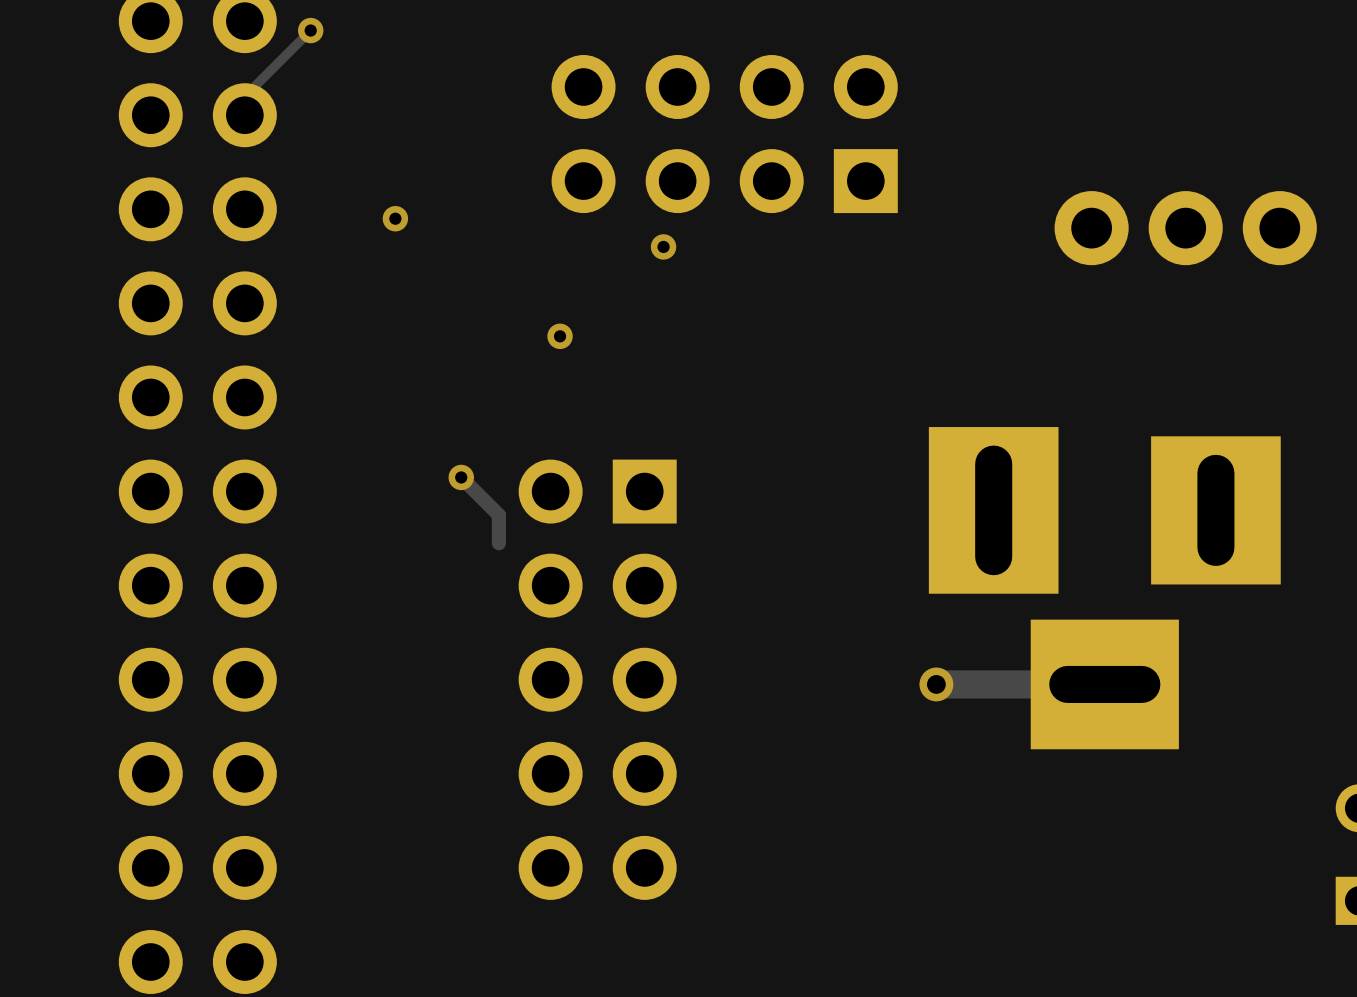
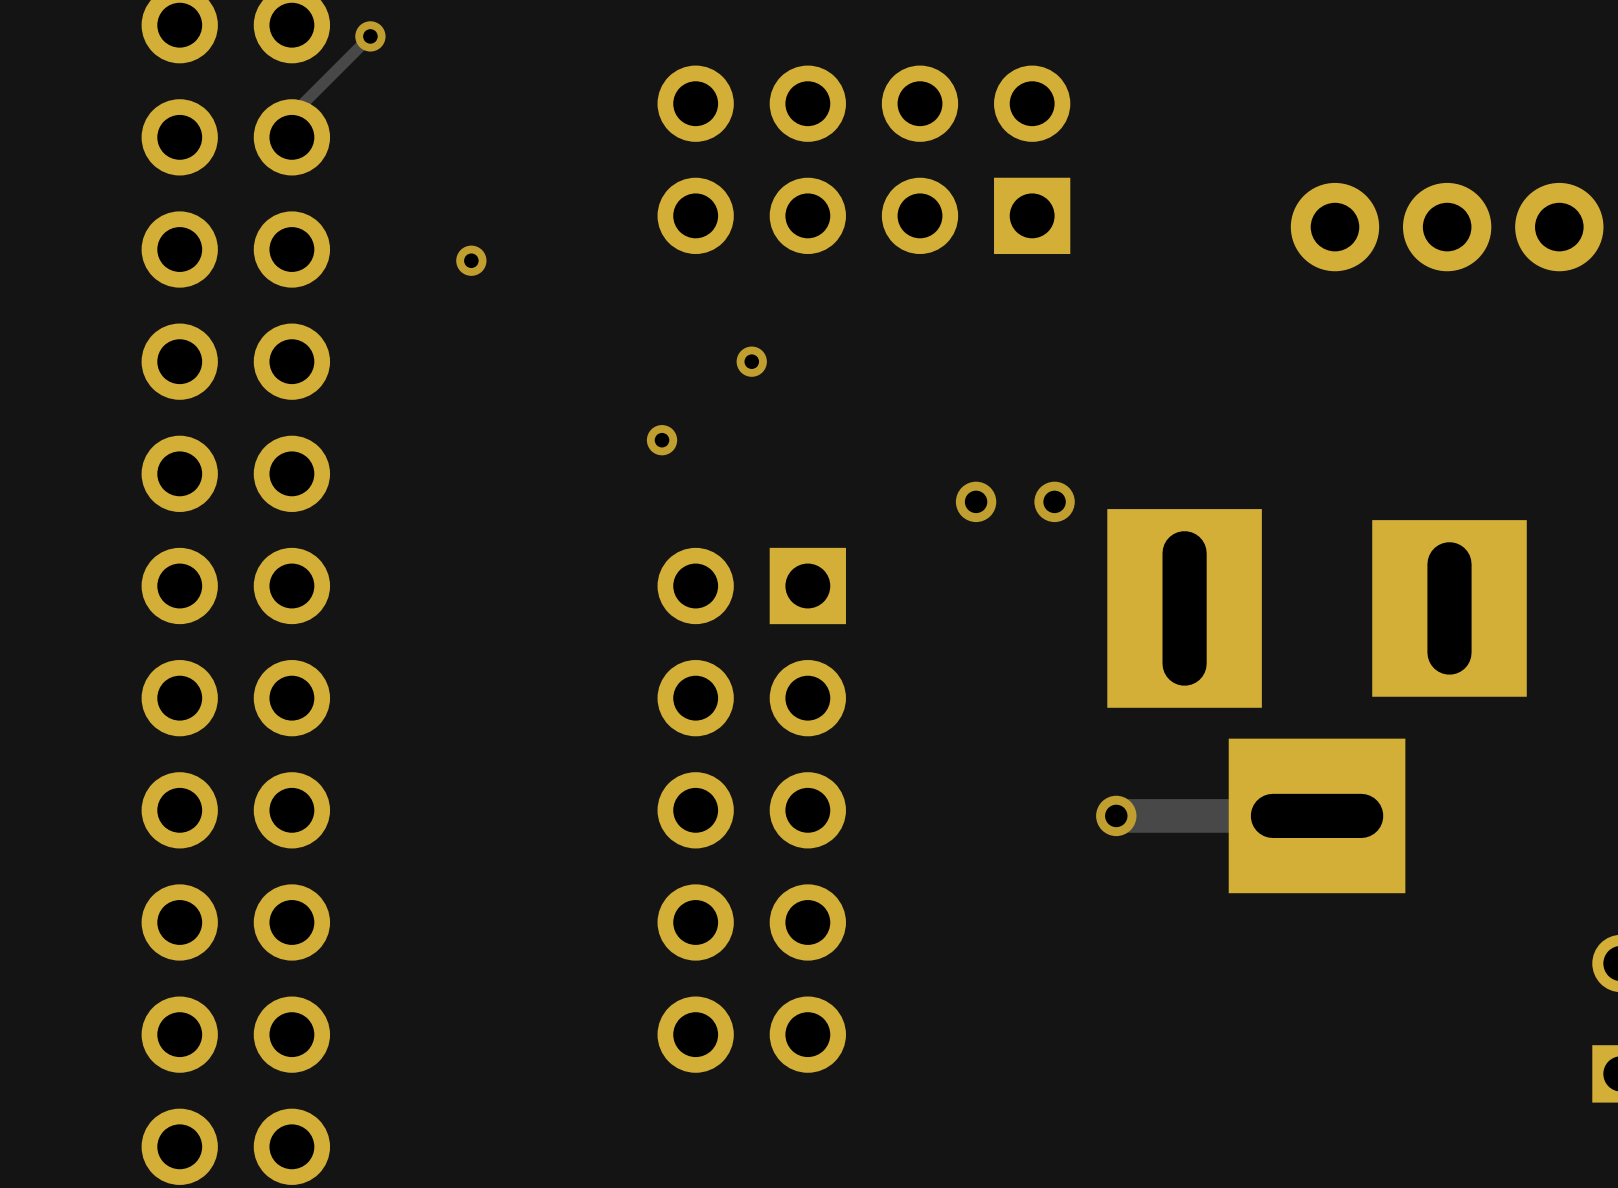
part position: (1185, 228) -> (1447, 227)
via: (663, 246) -> none
via: none -> (751, 361)
via position: (560, 336) -> (662, 440)
via: none -> (976, 501)
via: none -> (1054, 501)
track: (461, 477) (498, 515) (498, 543) -> none
via: (461, 477) -> none
part position: (597, 679) -> (751, 810)

